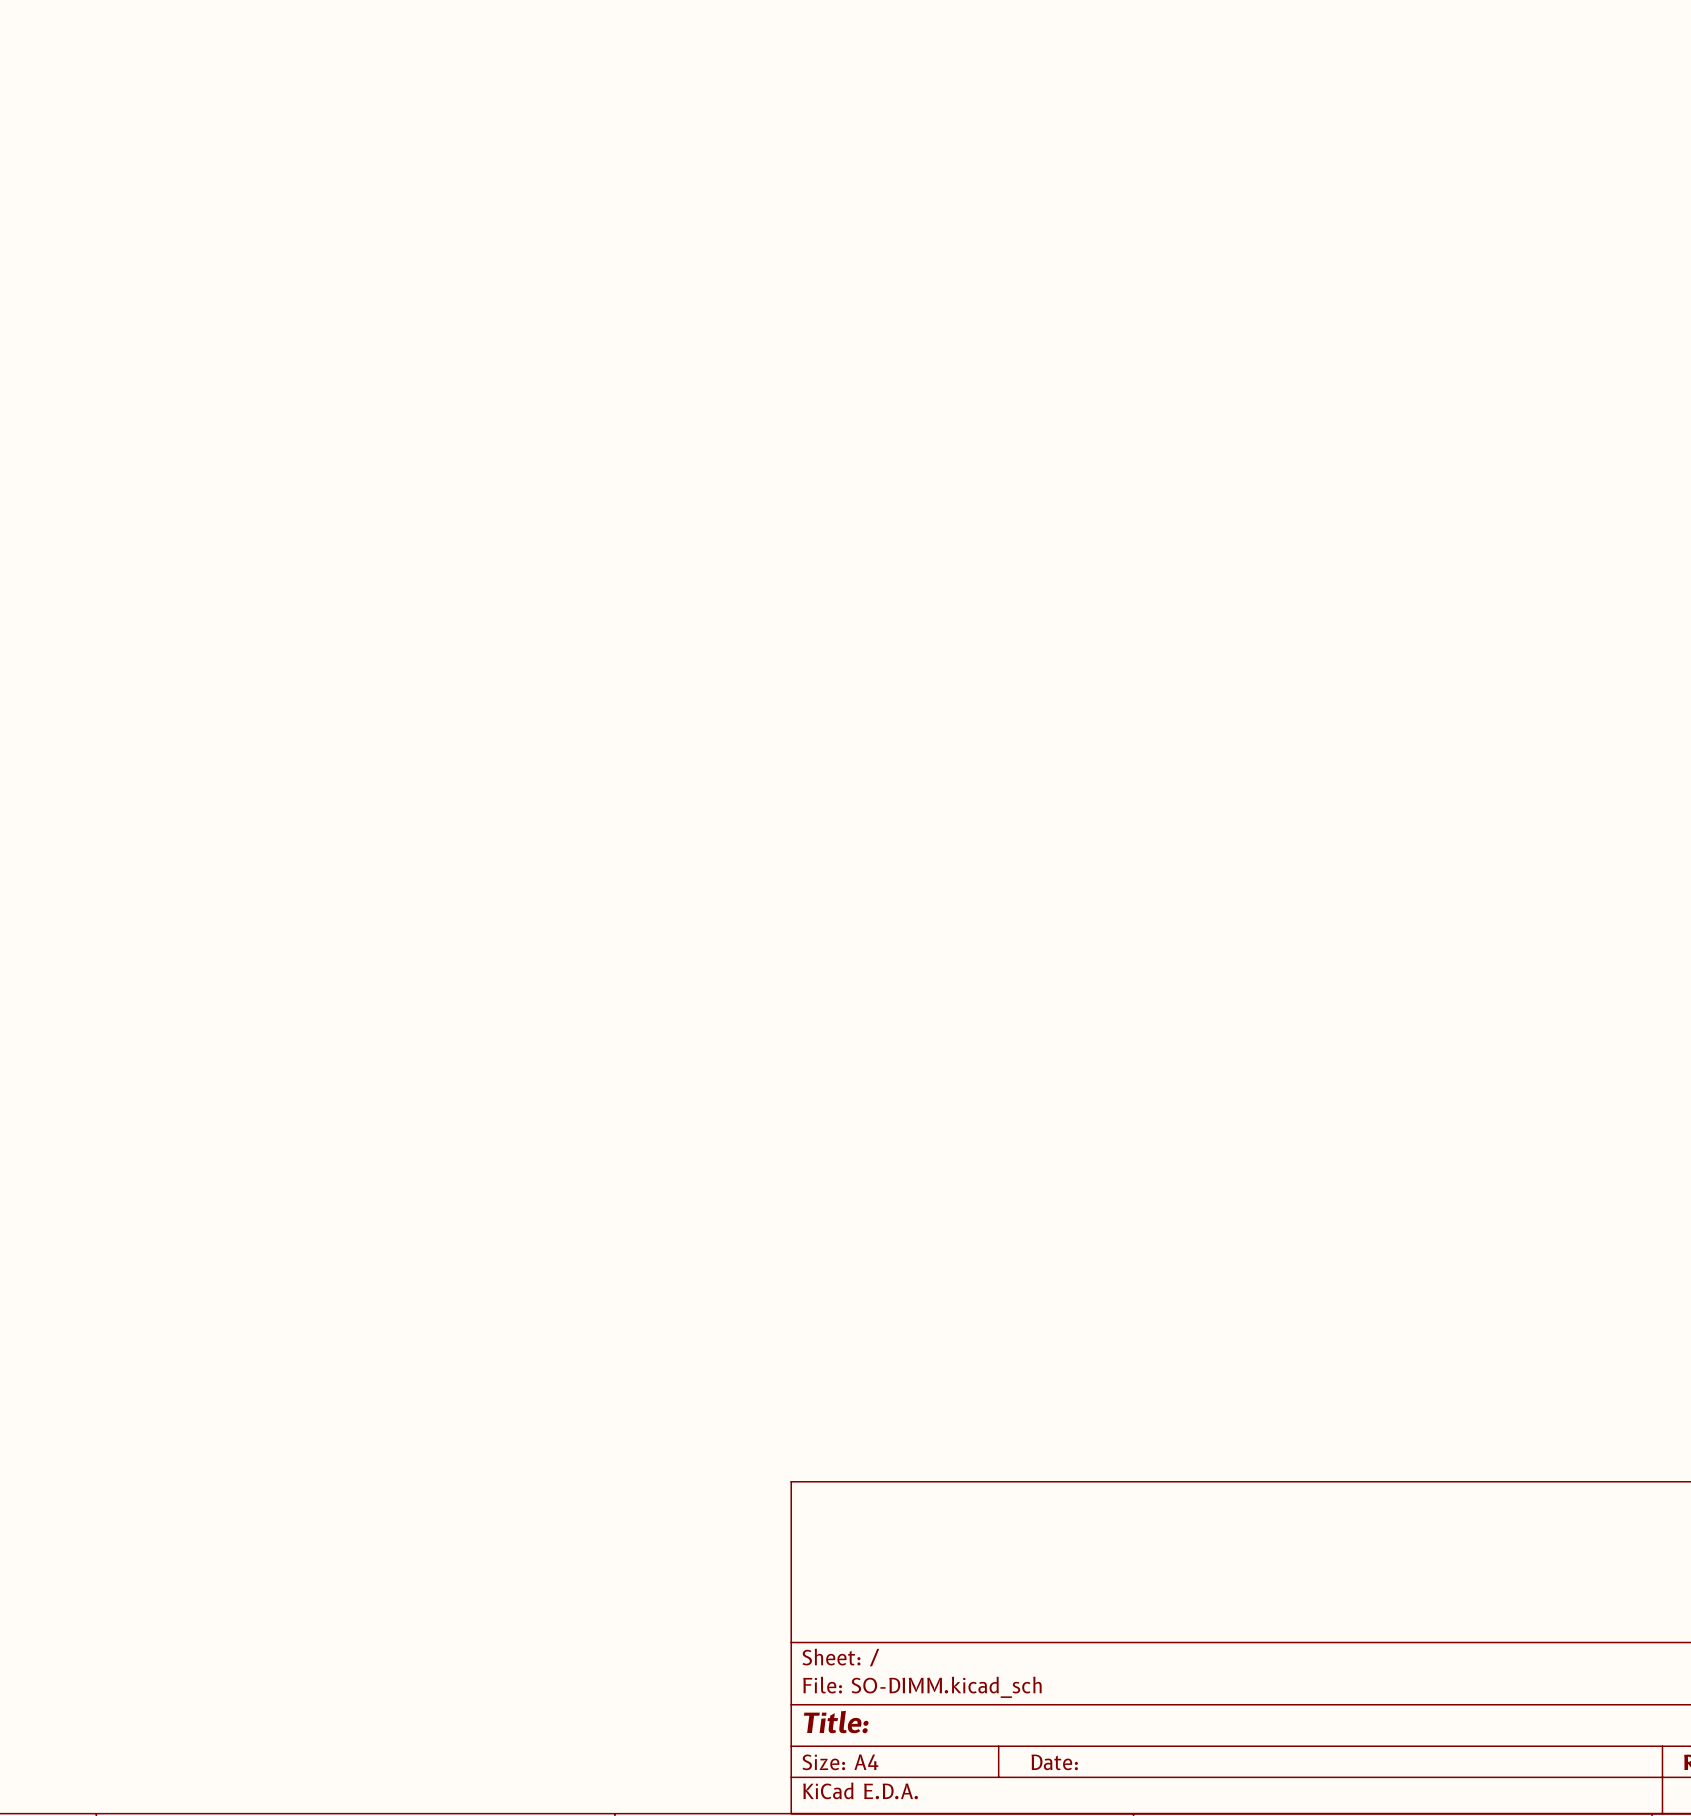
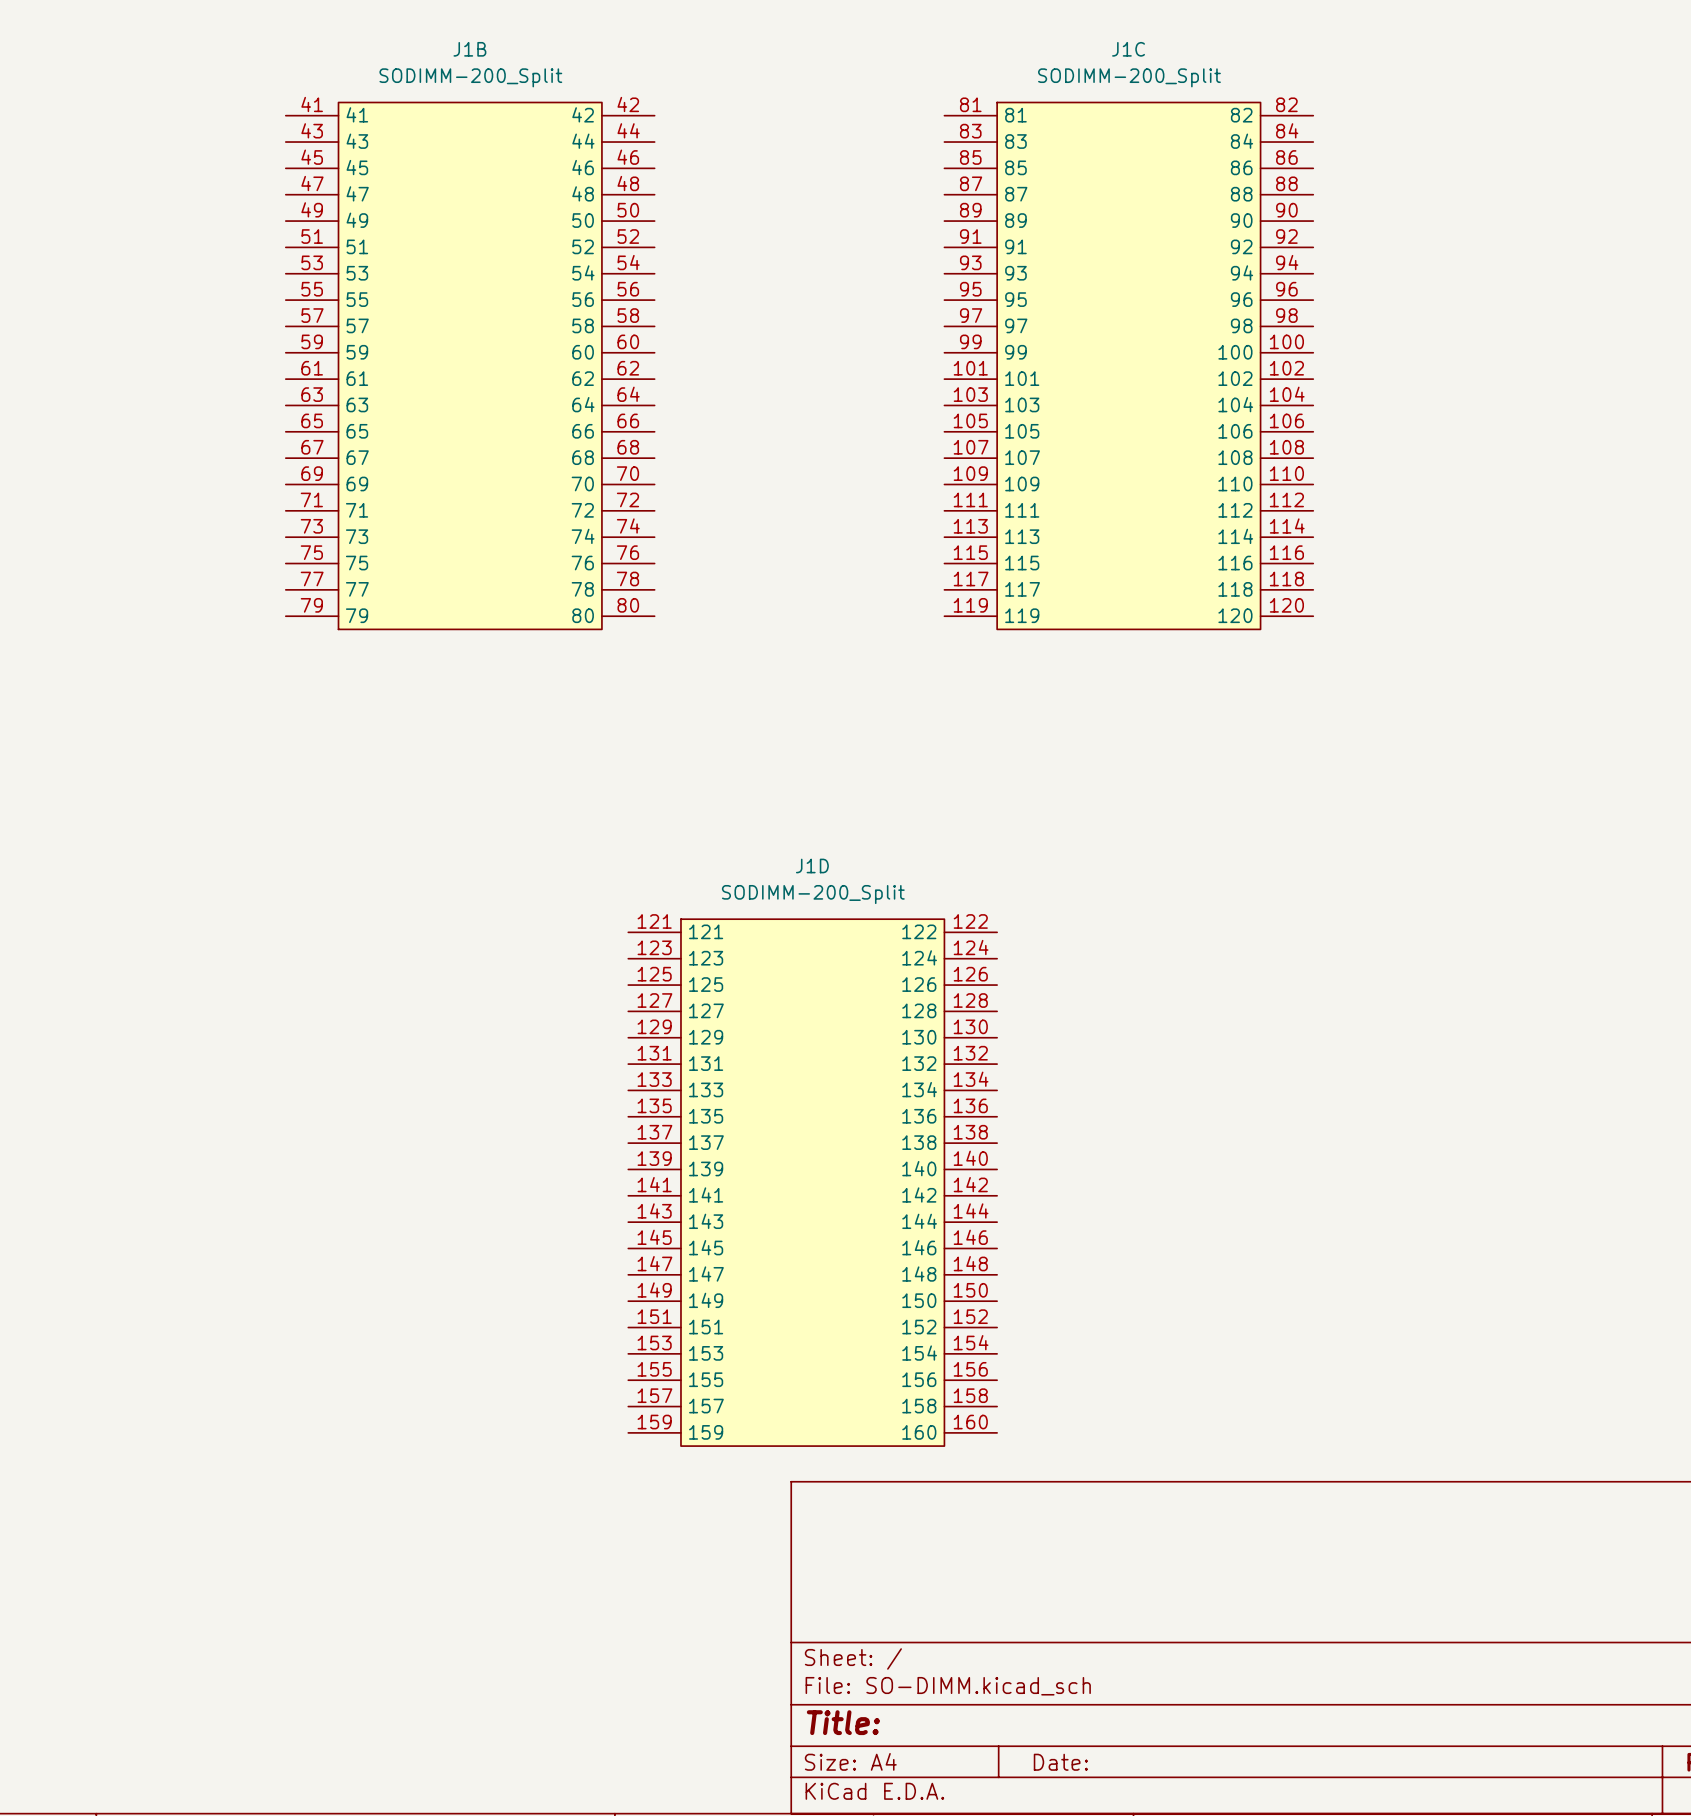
J1B: none -> SODIMM-200_Split (470, 365)
J1C: none -> SODIMM-200_Split (1128, 365)
J1D: none -> SODIMM-200_Split (812, 1182)

